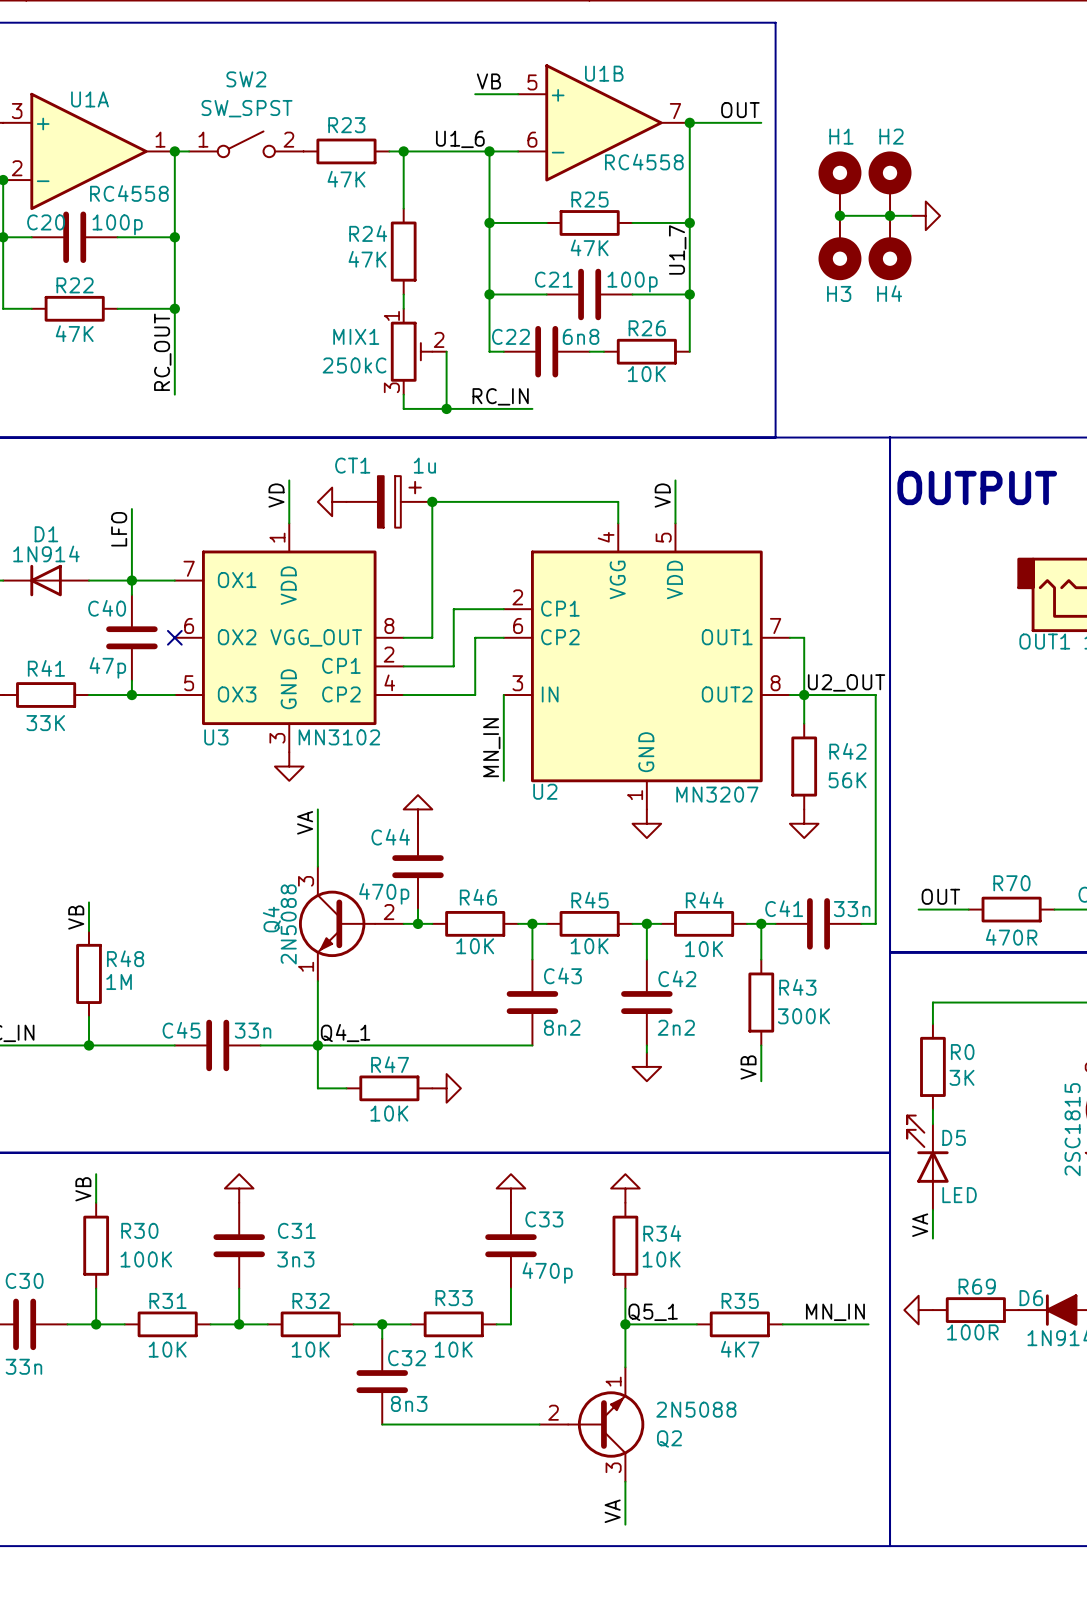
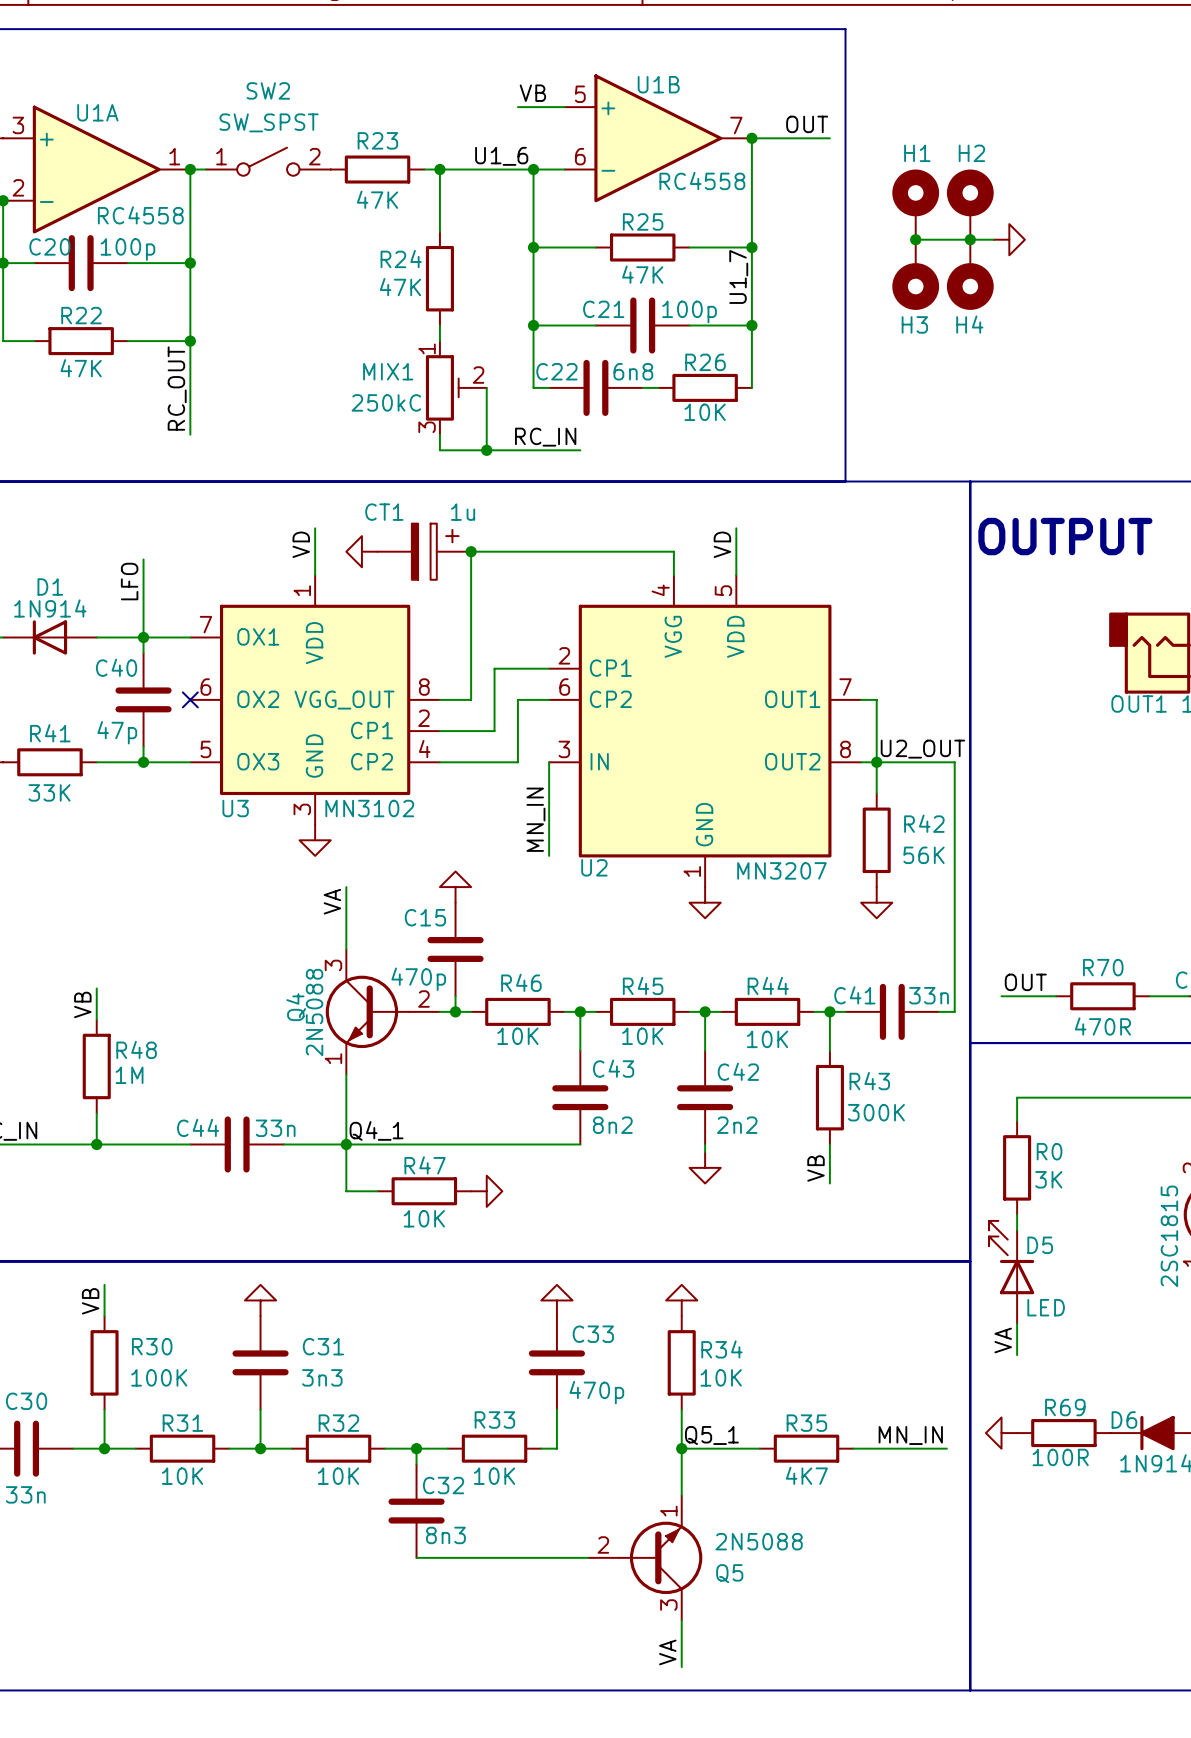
C44 name: C44 (390, 837) -> C15 (425, 917)
C45 name: C45 (181, 1030) -> C44 (198, 1127)
Q2 name: Q2 (669, 1438) -> Q5 (729, 1573)

